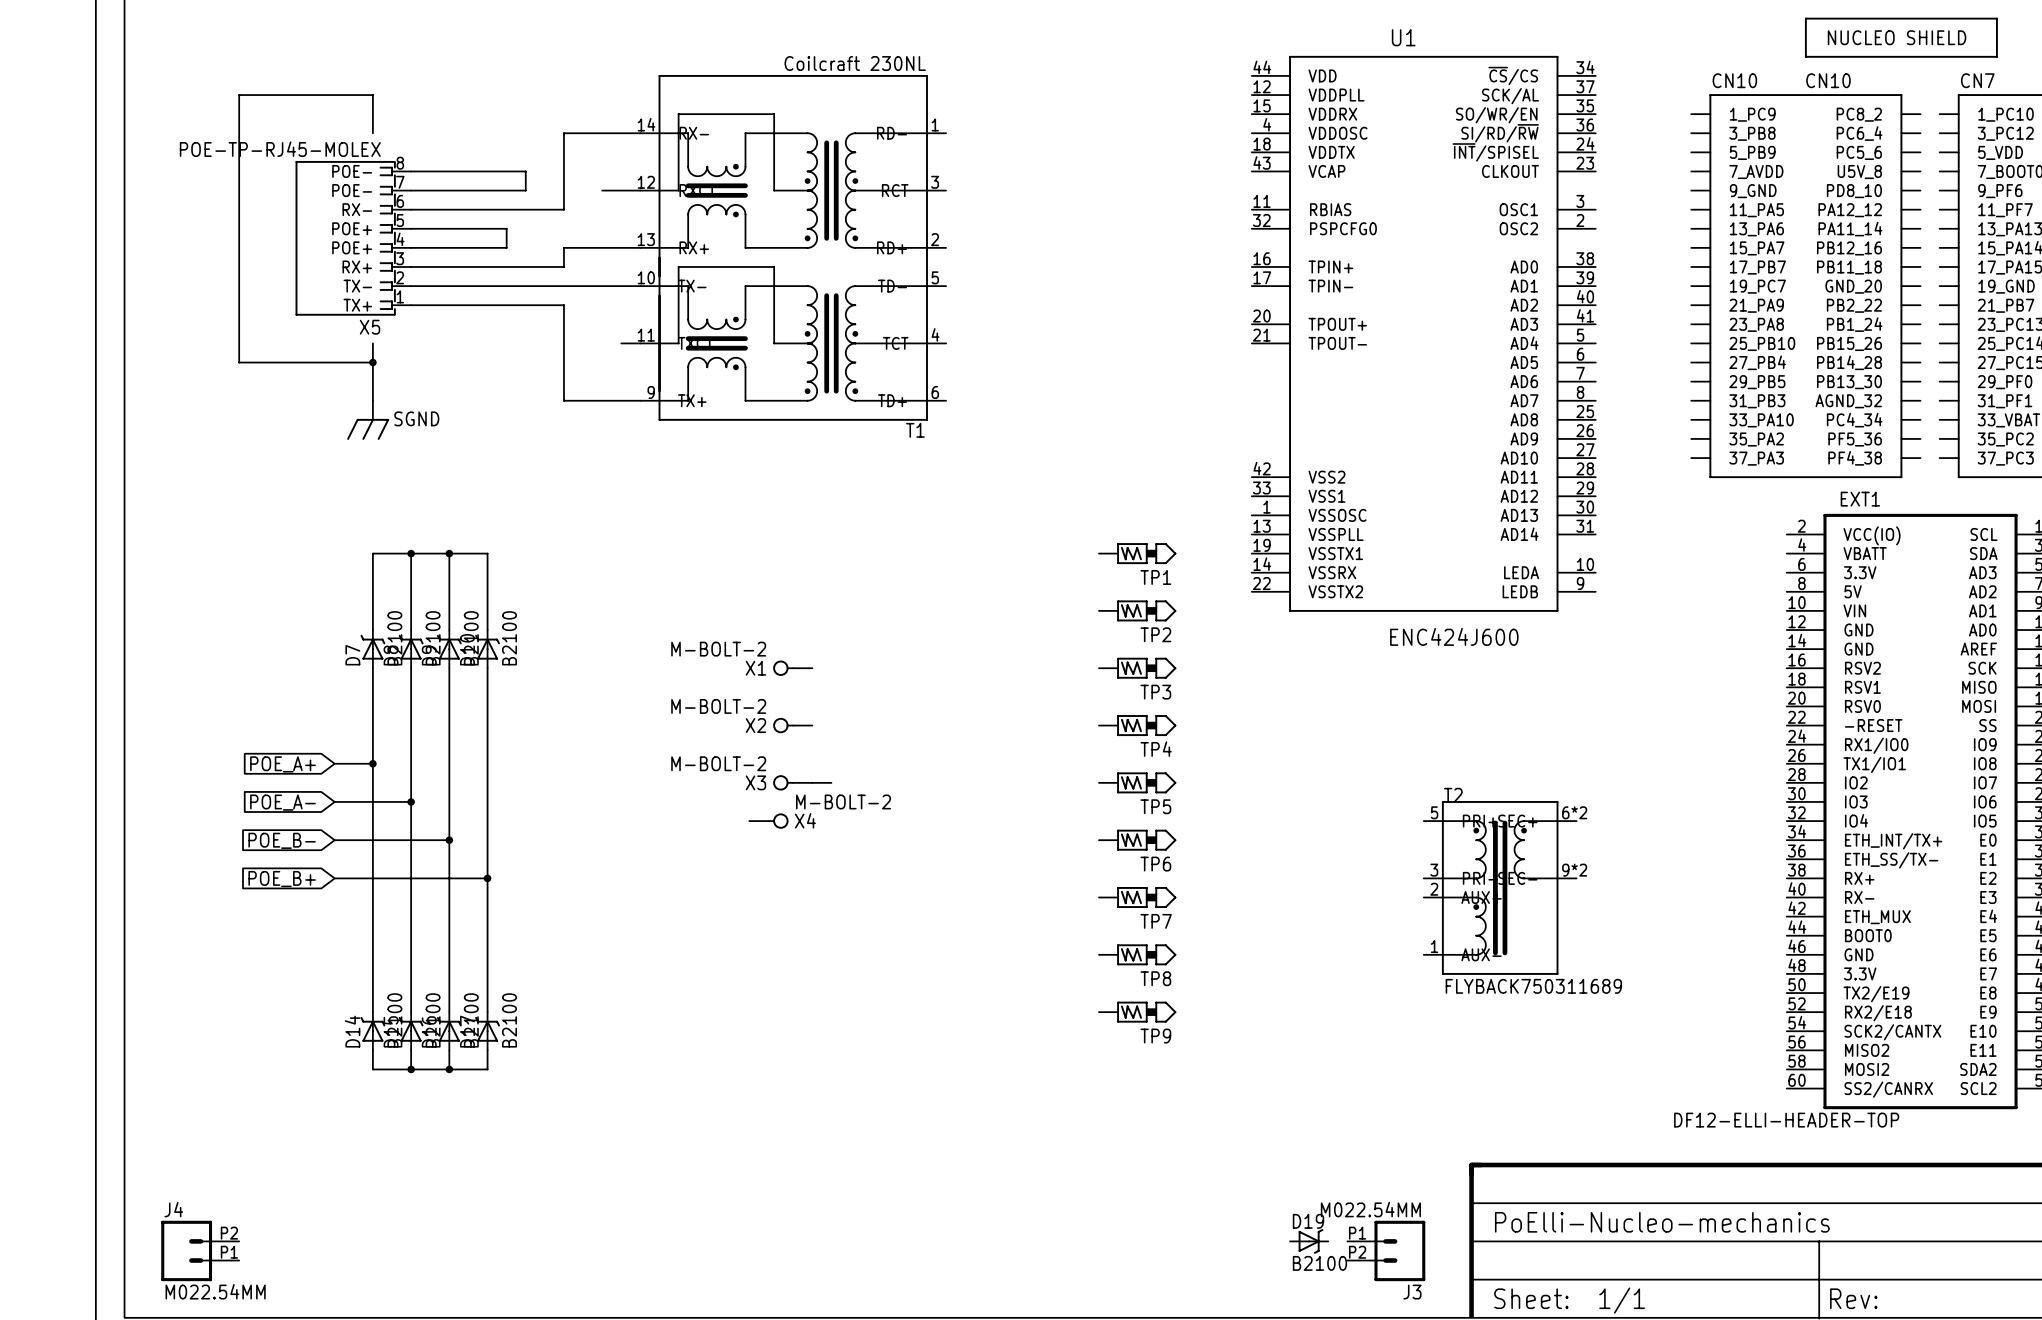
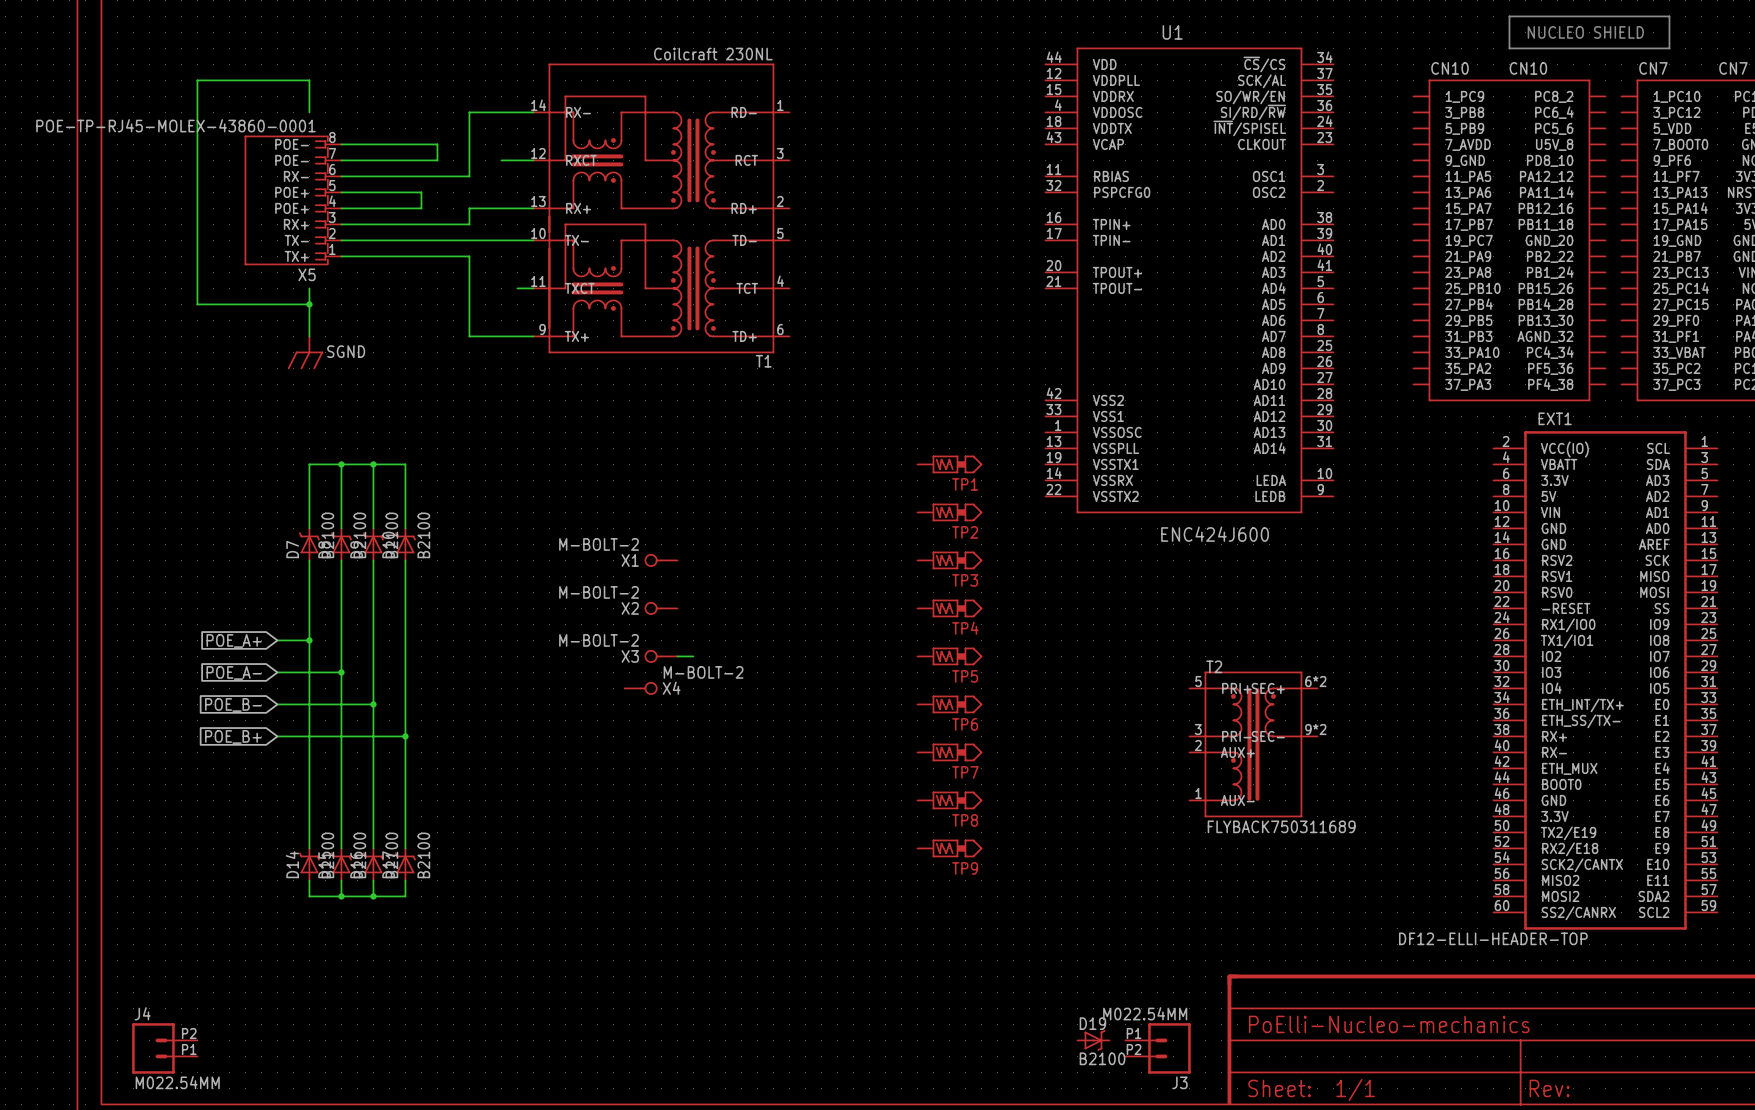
X5 value: POE-TP-RJ45-MOLEX (280, 149) -> POE-TP-RJ45-MOLEX-43860-0001 (175, 125)

